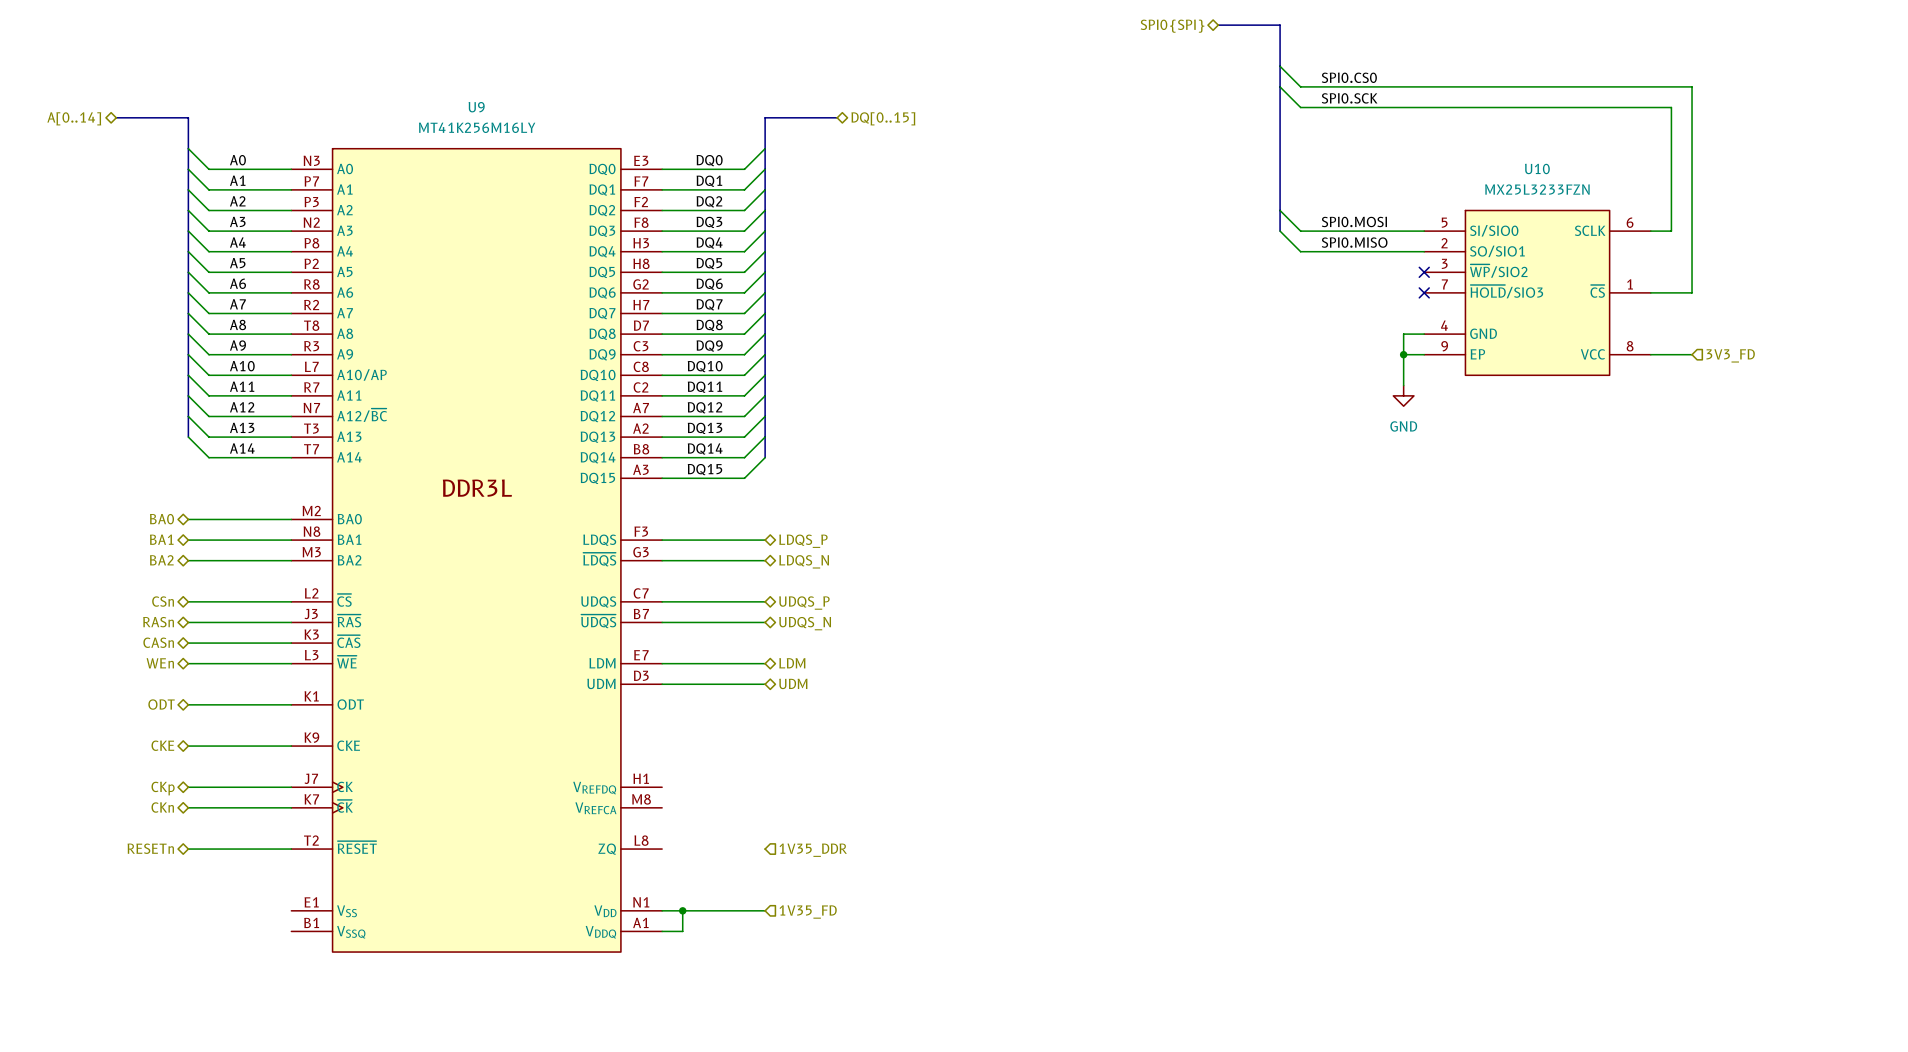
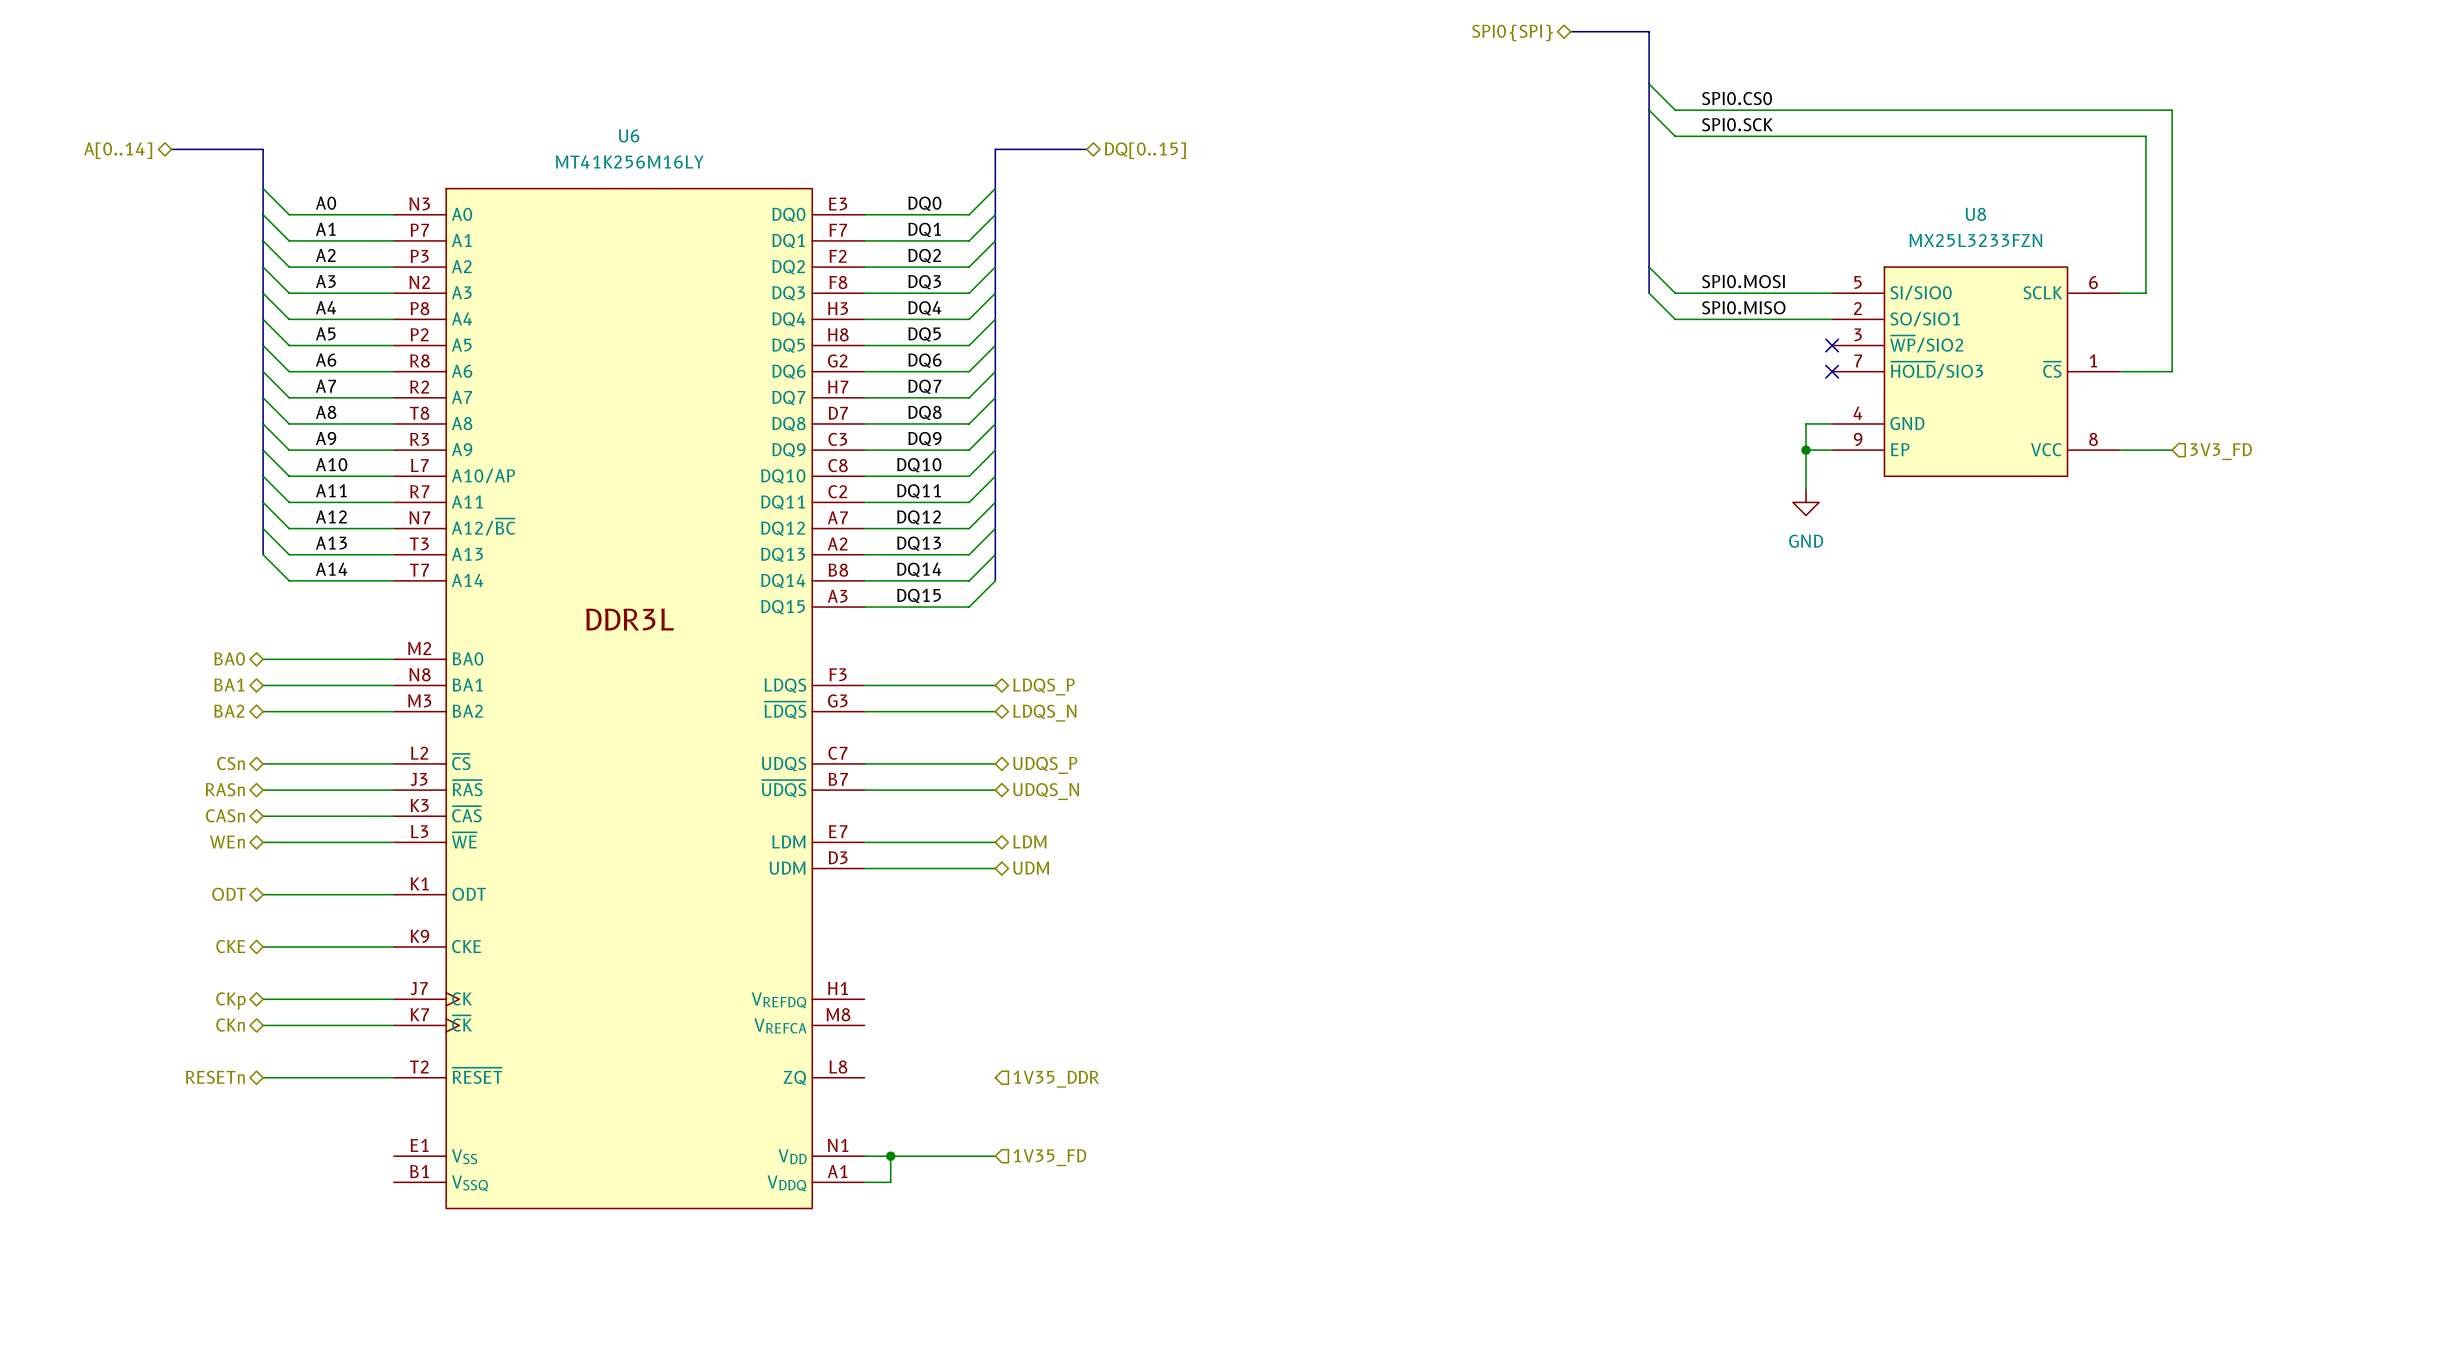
U9 name: U9 (476, 107) -> U6 (629, 135)
U10 name: U10 (1537, 168) -> U8 (1975, 214)

